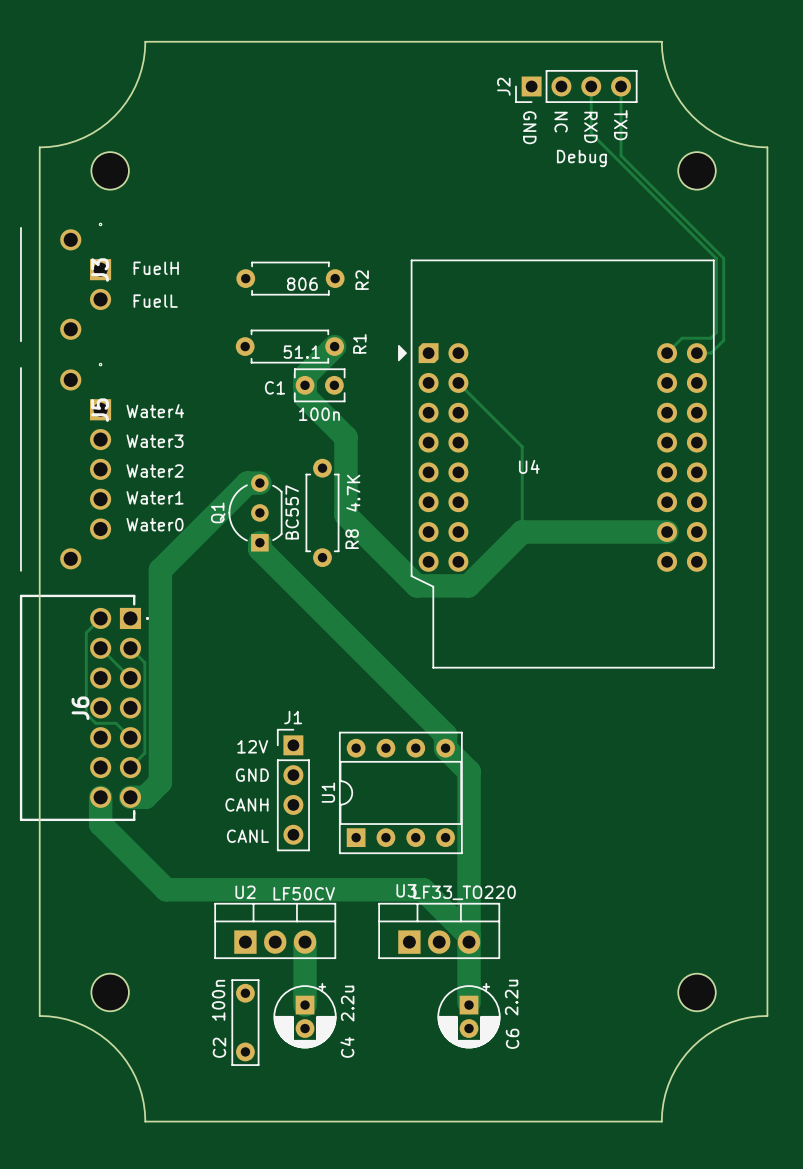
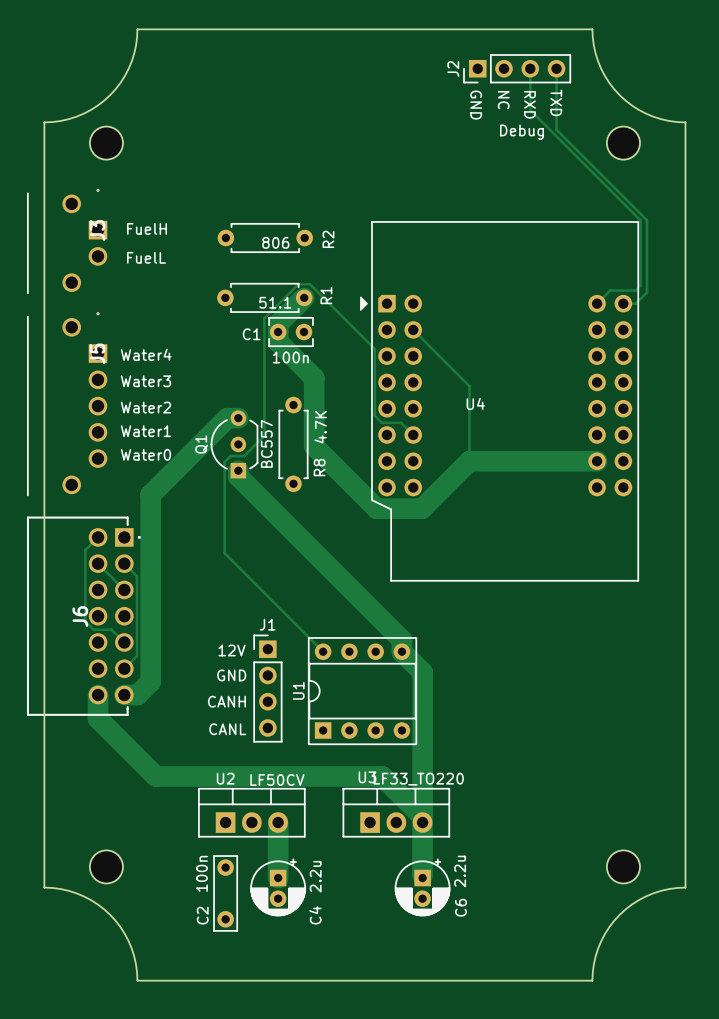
track: none -> (413, 434) (401, 422) (381, 422) (374, 415) (374, 349) (309, 284) (298, 284) (264, 318) (264, 435) (244, 456) (230, 456) (224, 462) (224, 553) (323, 651)

